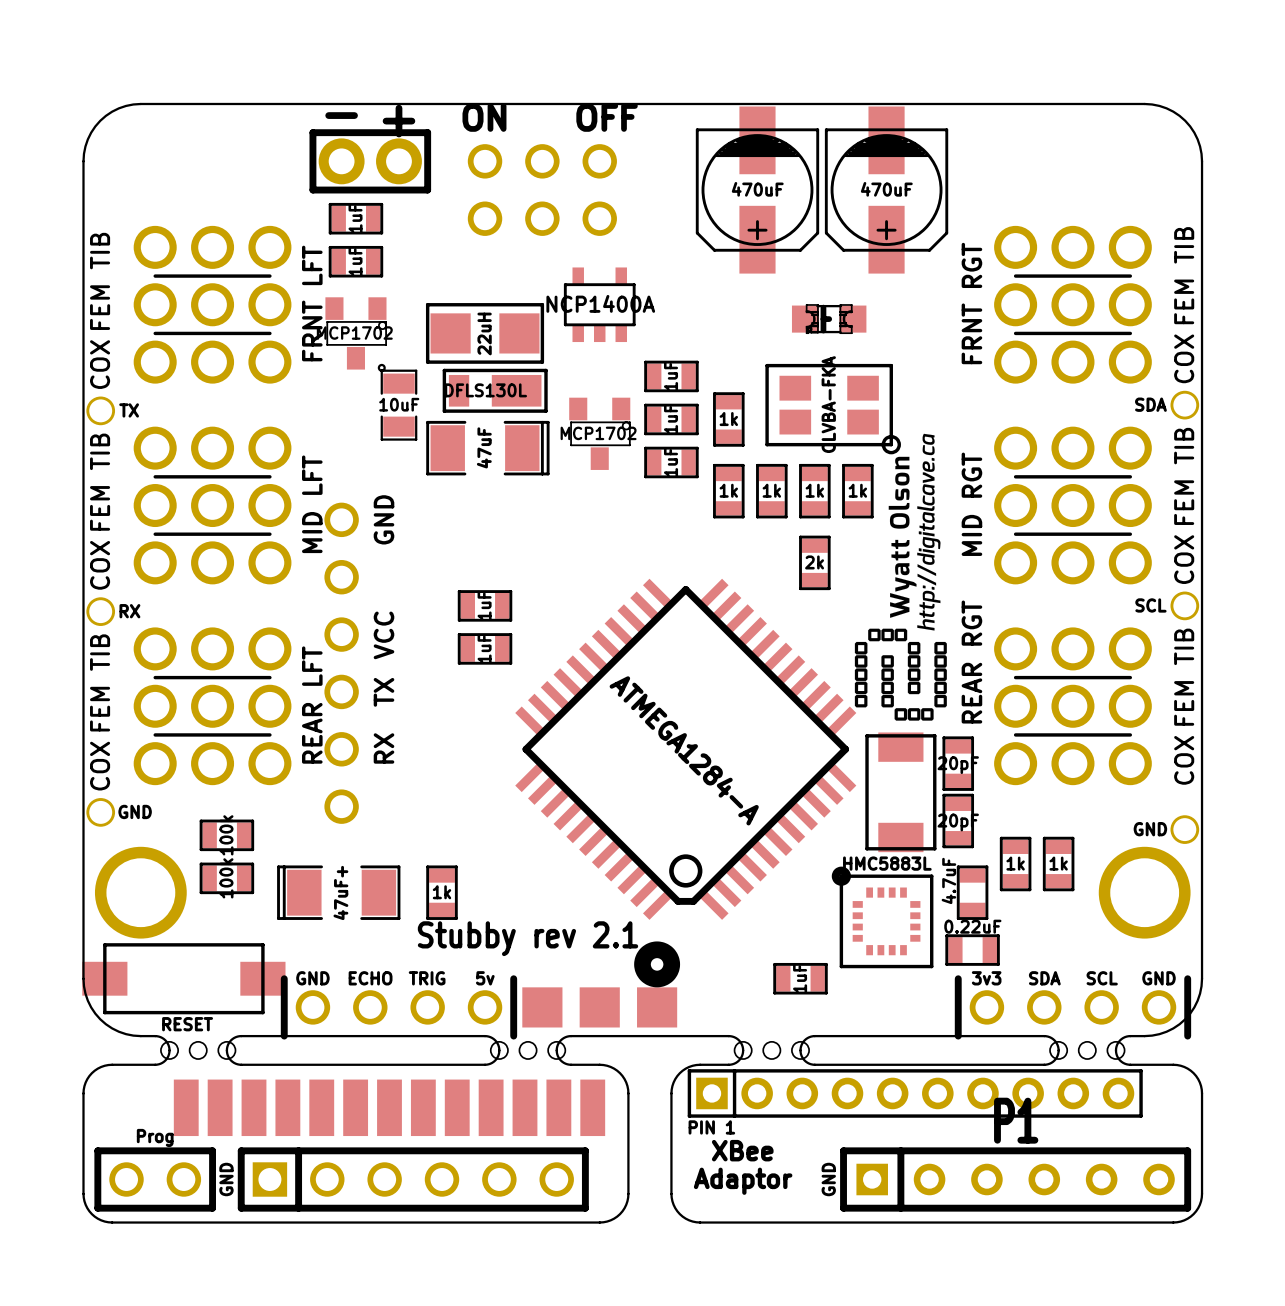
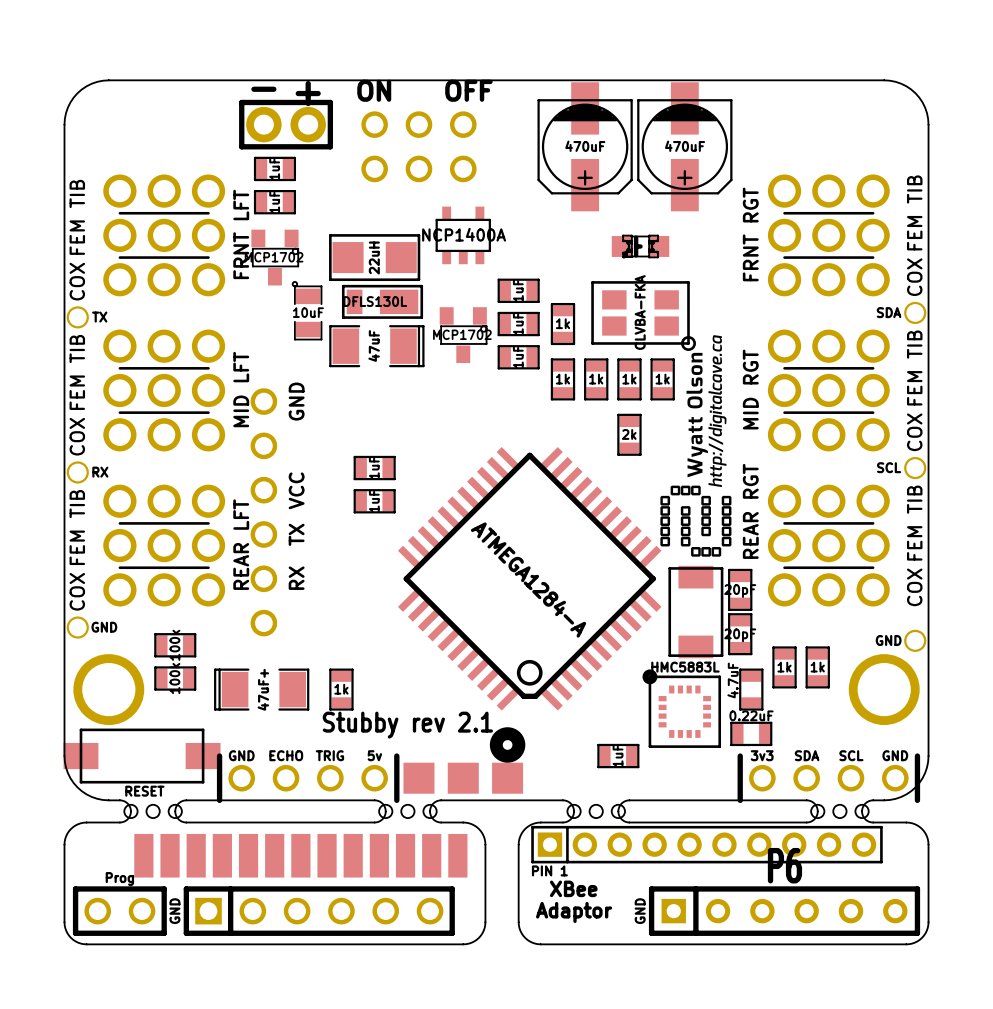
P1 name: P1 (1016, 1120) -> P6 (784, 865)

